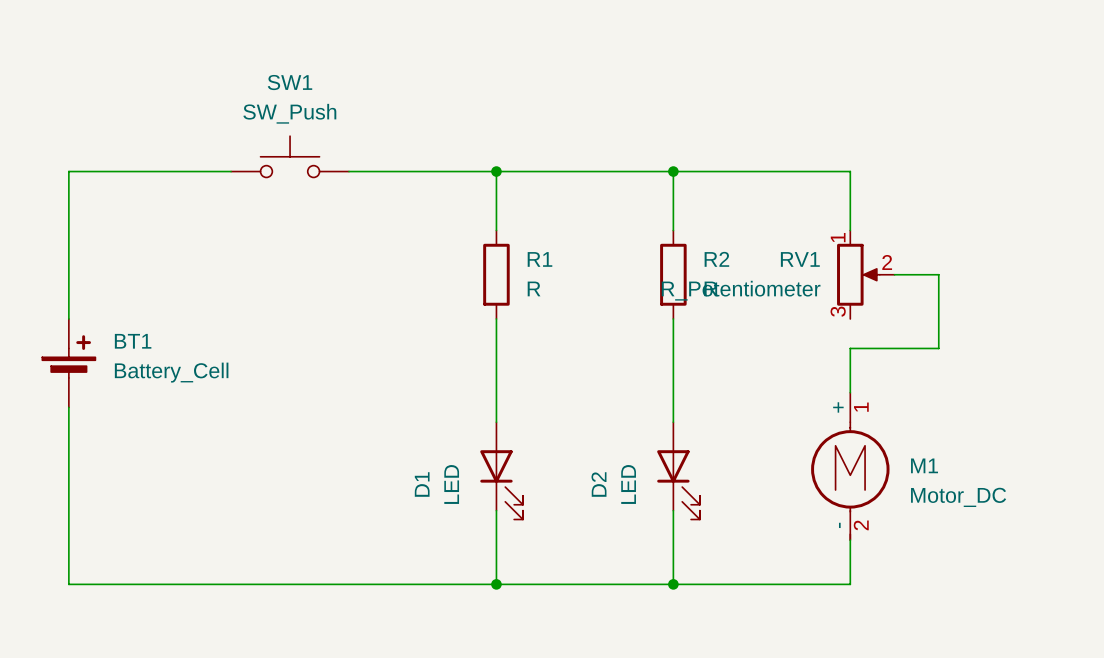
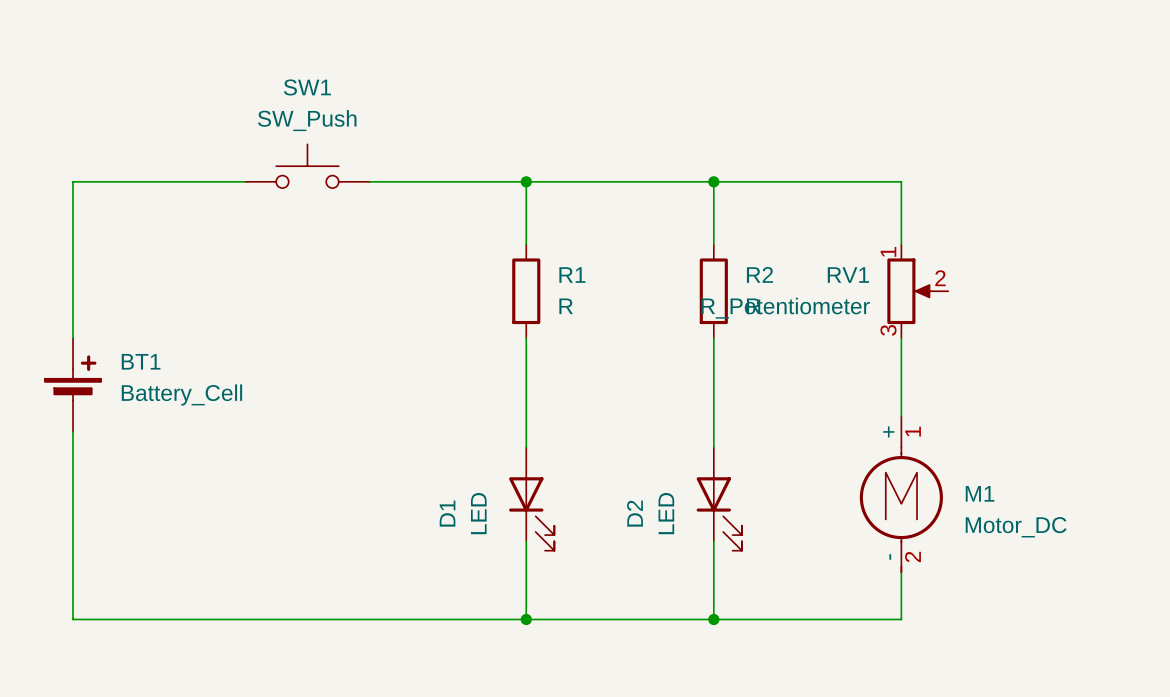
wire: (894, 274) (938, 274) (938, 348) (850, 348) -> (901, 338) (901, 369)

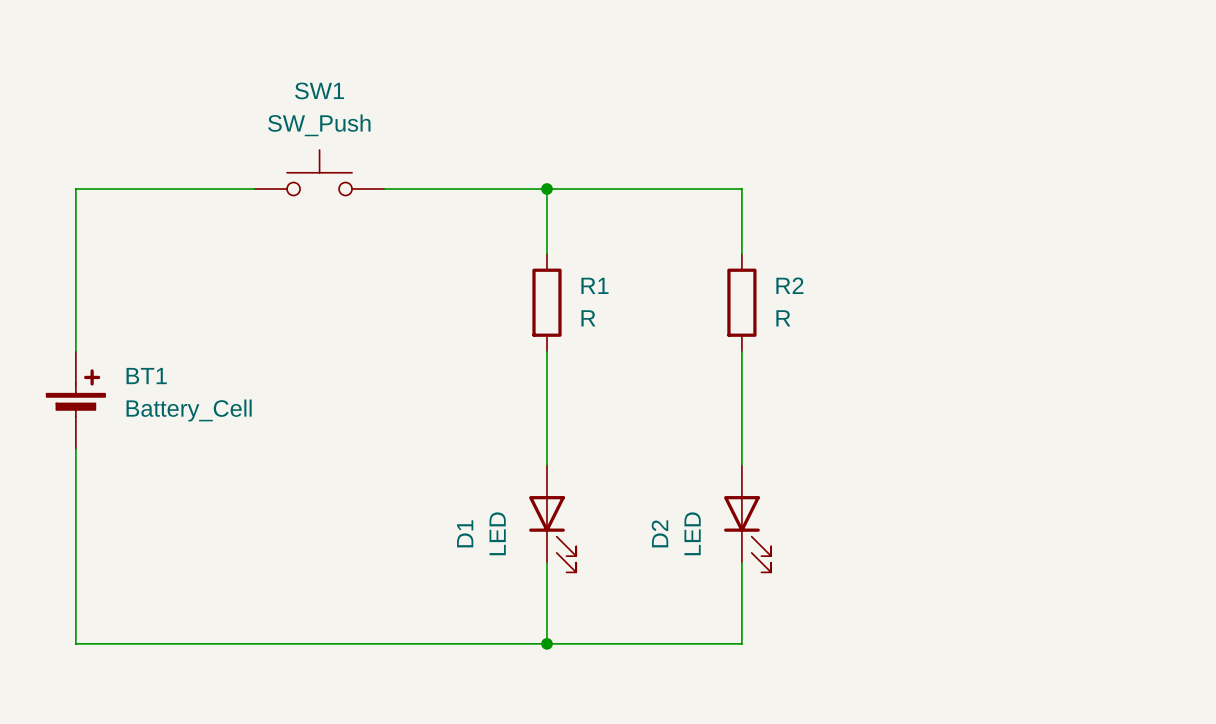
wire: (713, 181) (901, 181) (901, 244) -> none
junction: (713, 181) -> none
RV1: R_Potentiometer (917, 291) -> none
wire: (901, 338) (901, 416) -> none
M1: Motor_DC (901, 494) -> none
wire: (901, 572) (901, 619) (713, 619) -> none
junction: (713, 619) -> none

